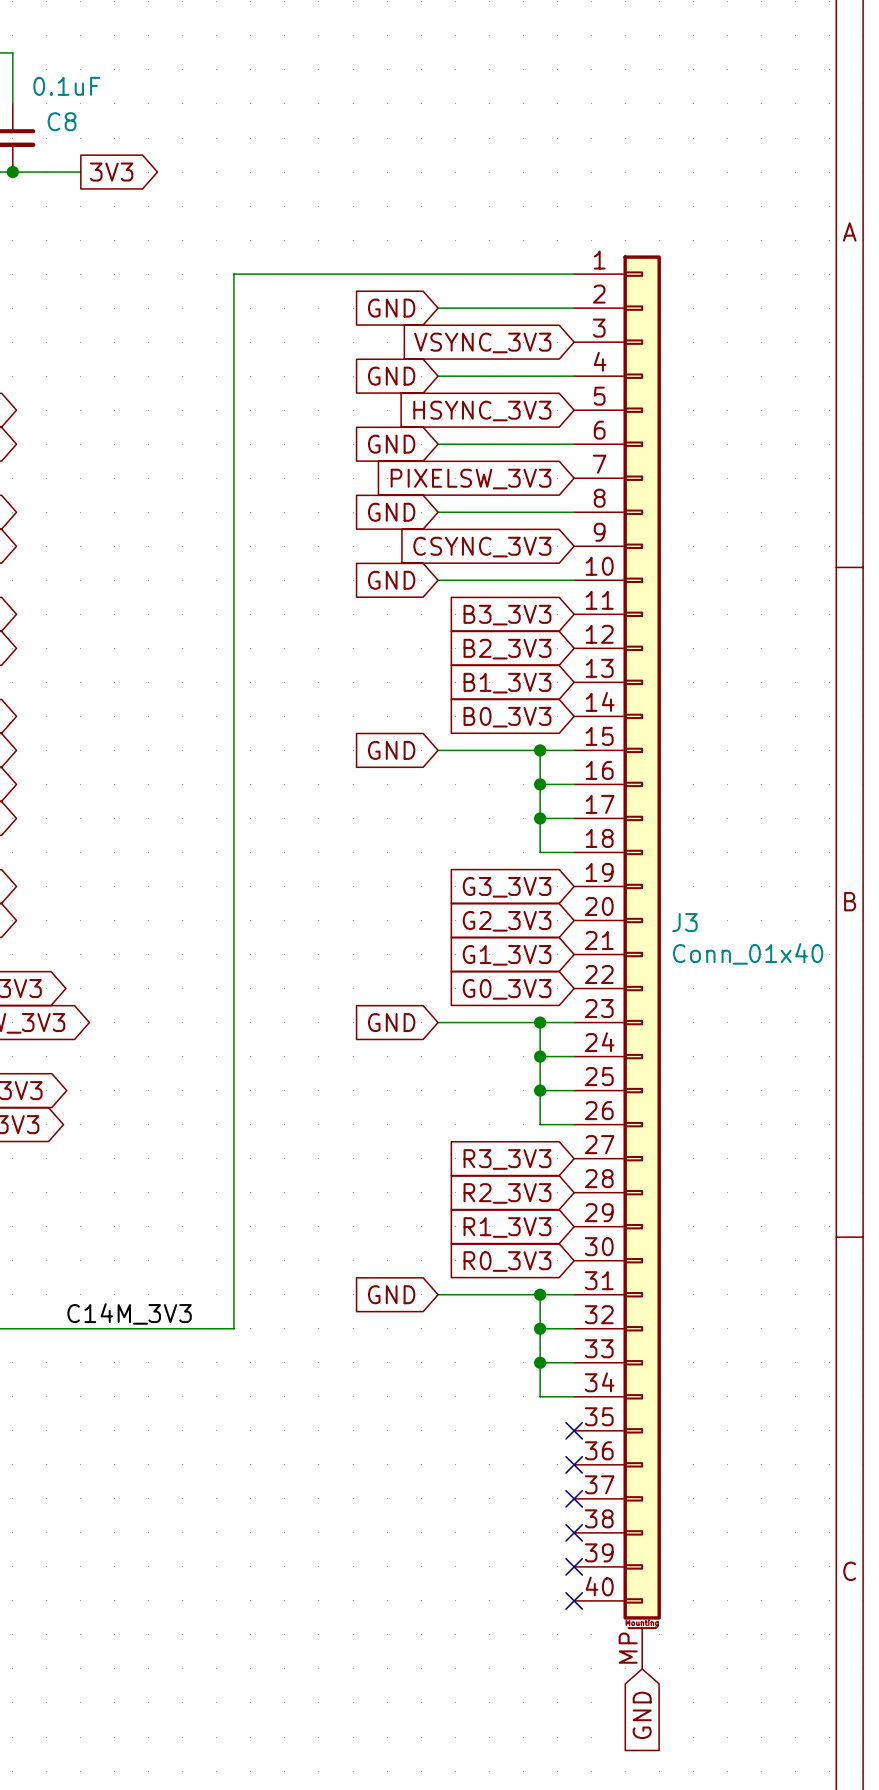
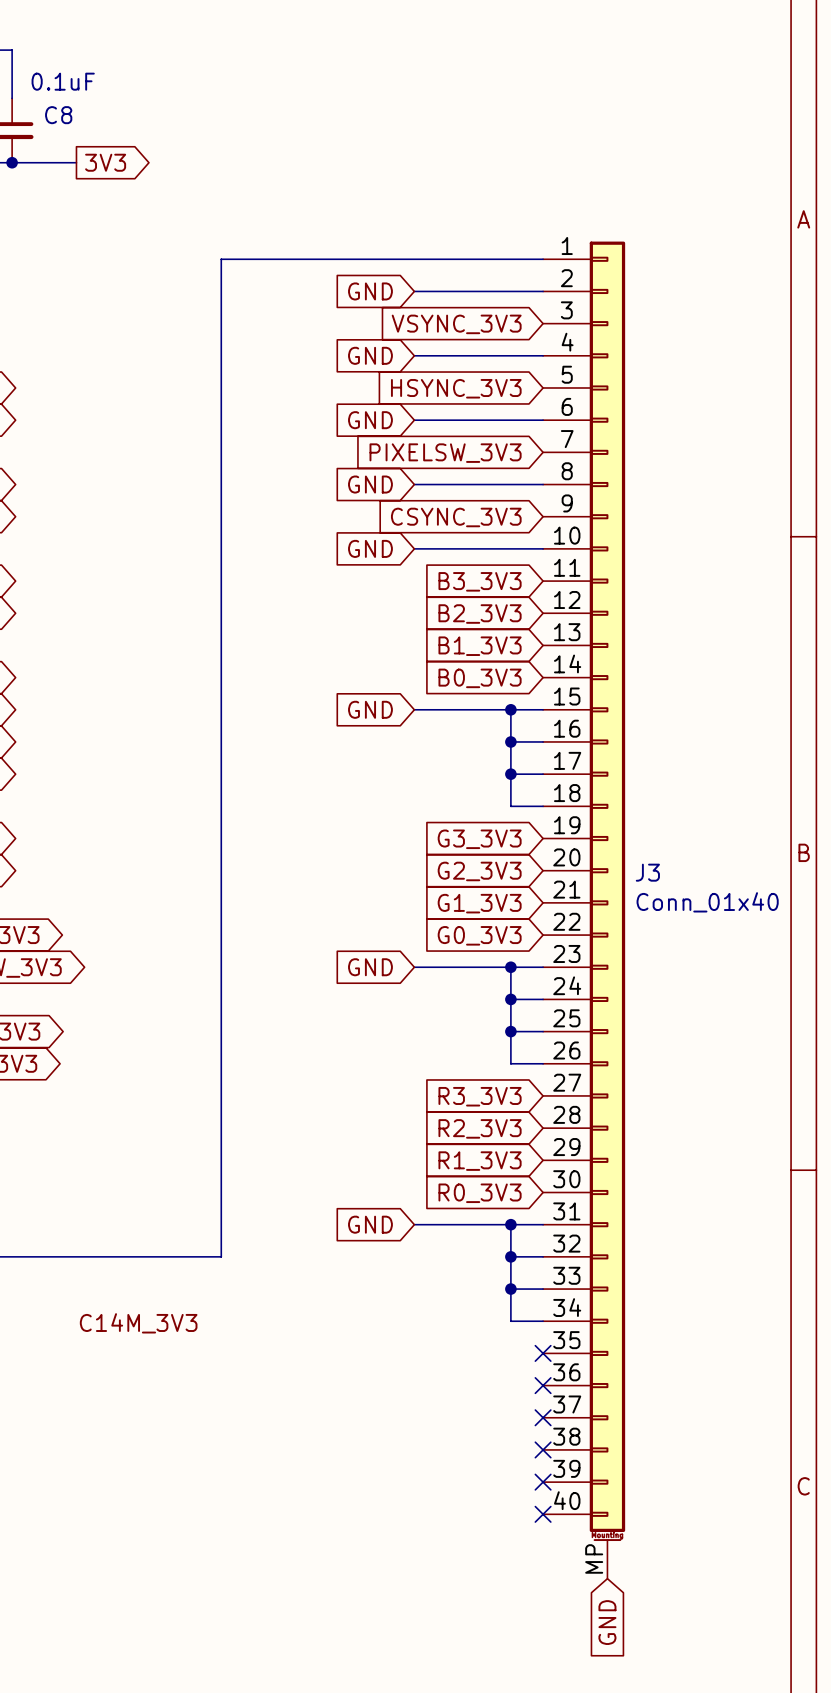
label position: C14M_3V3 (129, 1313) -> C14M_3V3 (138, 1323)

